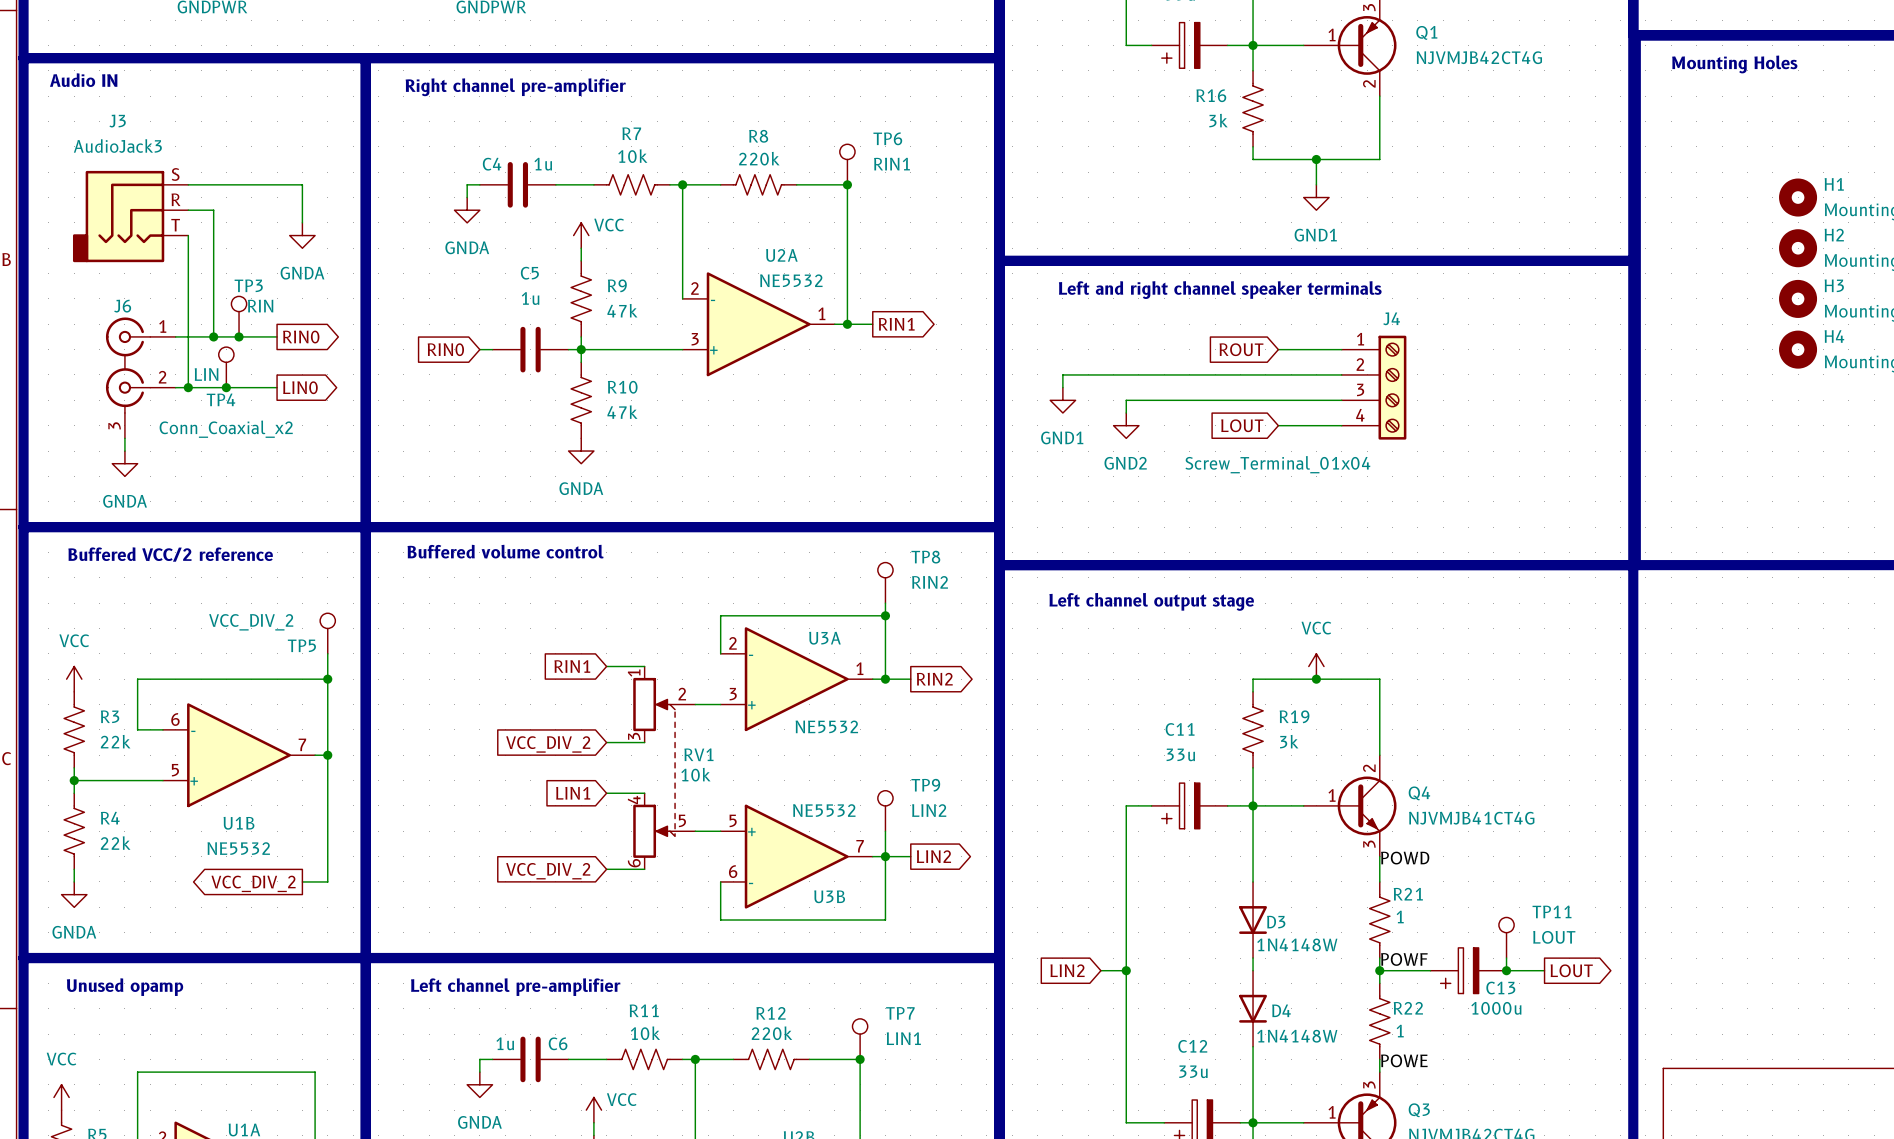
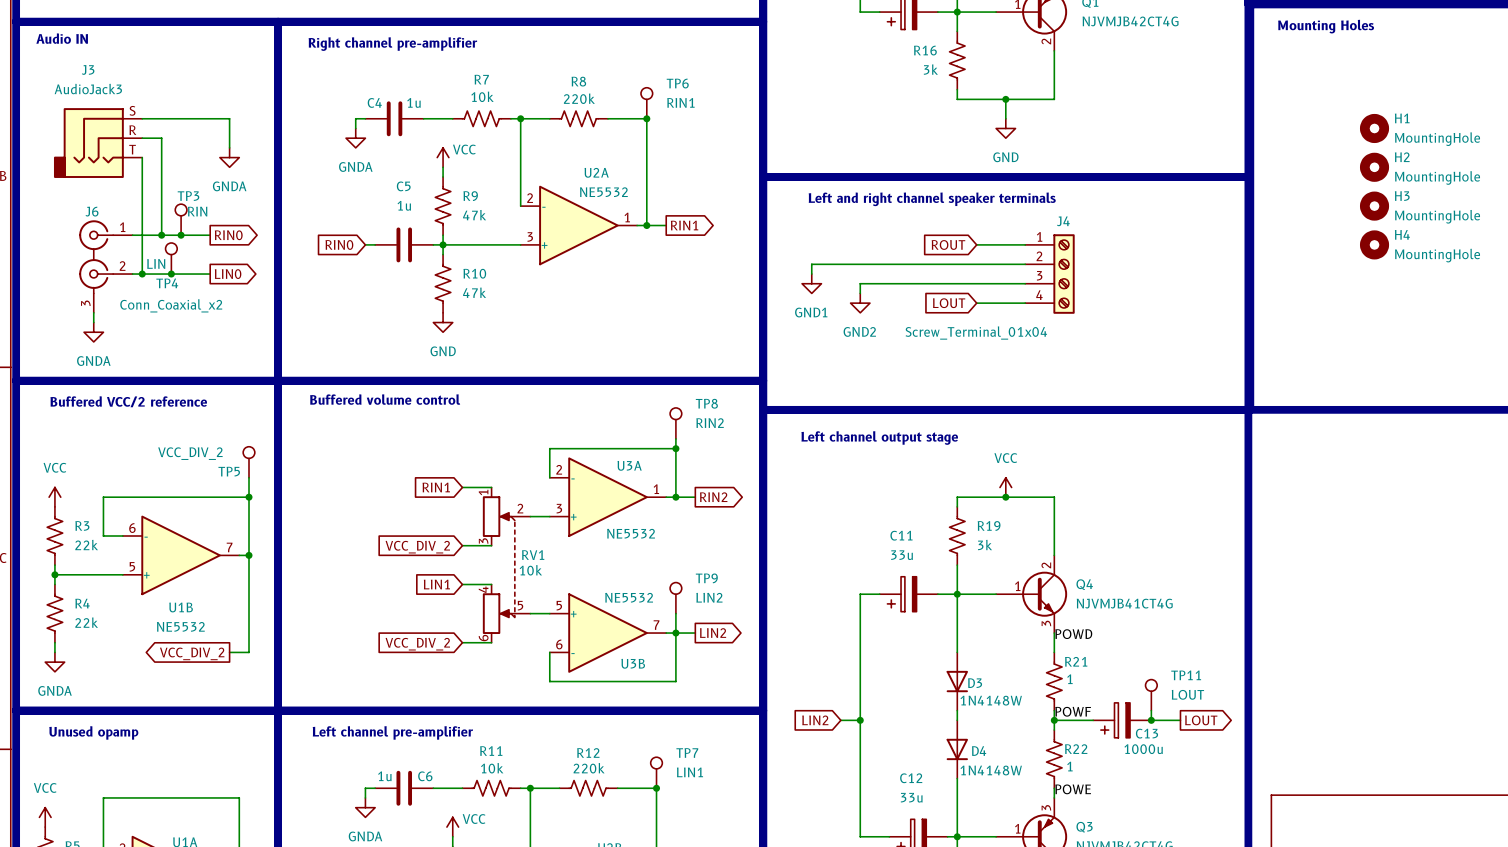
power symbol: GND1 (1316, 197) -> GND (1005, 128)
power symbol: GNDA (581, 451) -> GND (443, 322)

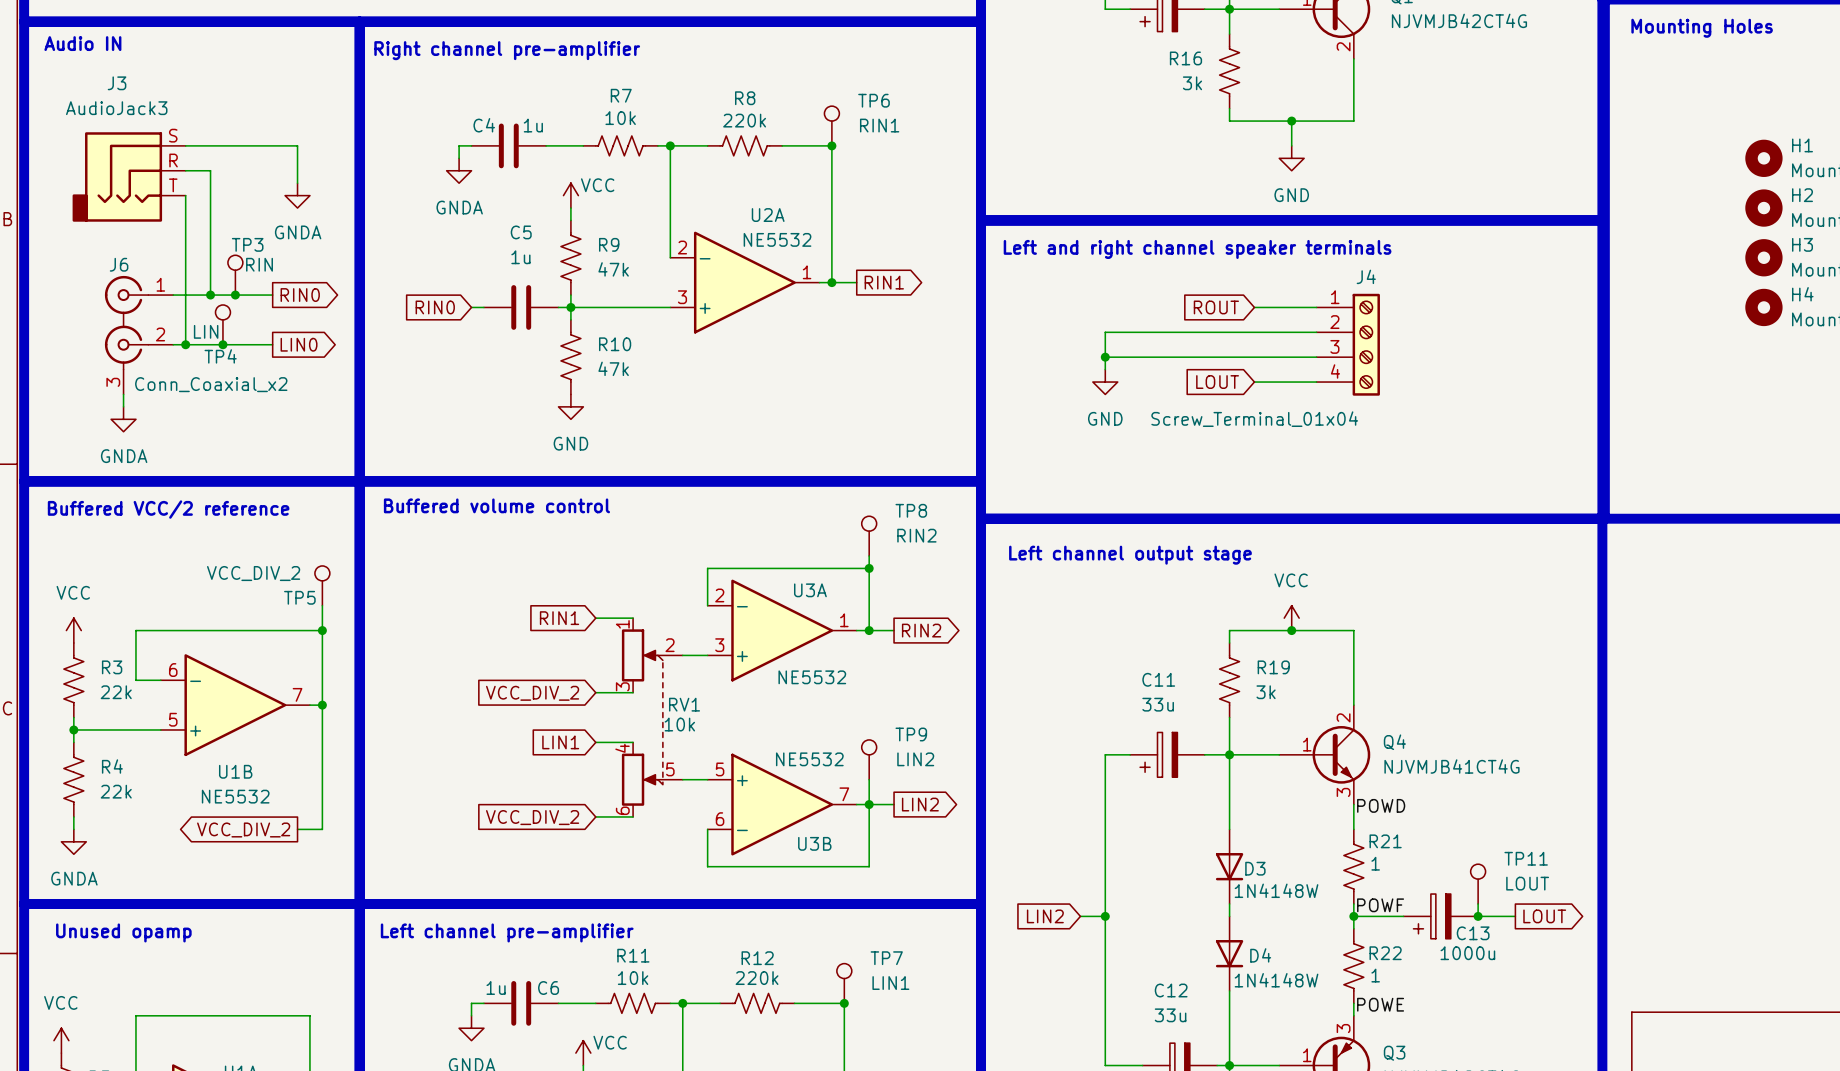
wire: (860, 264) (811, 264) (811, 274) -> (1105, 332) (1105, 357)
power symbol: GND1 (811, 283) -> none
junction: none -> (1105, 357)
power symbol: GND2 (860, 303) -> GND (1105, 382)

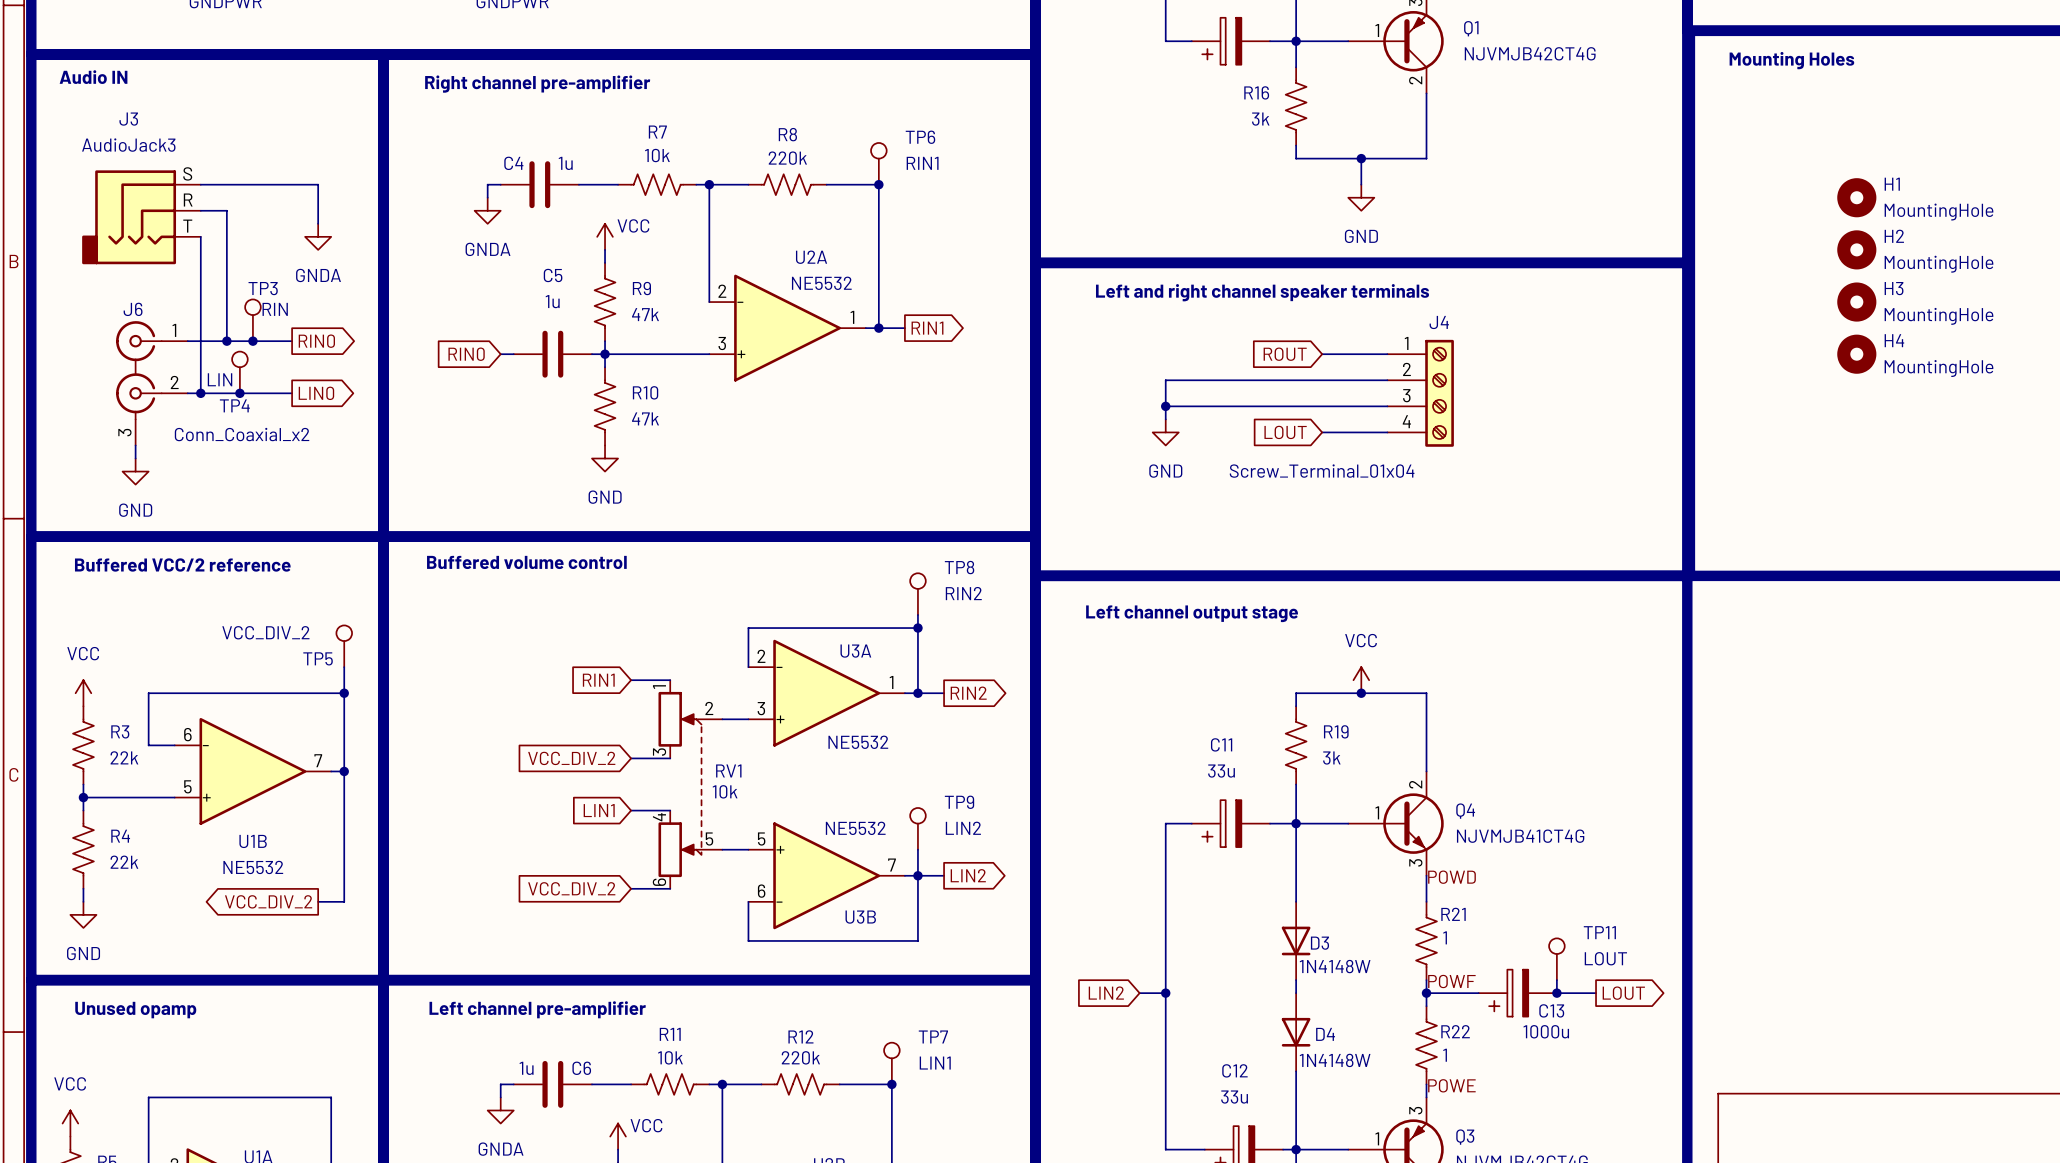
power symbol: GNDA (123, 419) -> GND (135, 471)
power symbol: GNDA (73, 841) -> GND (83, 914)

